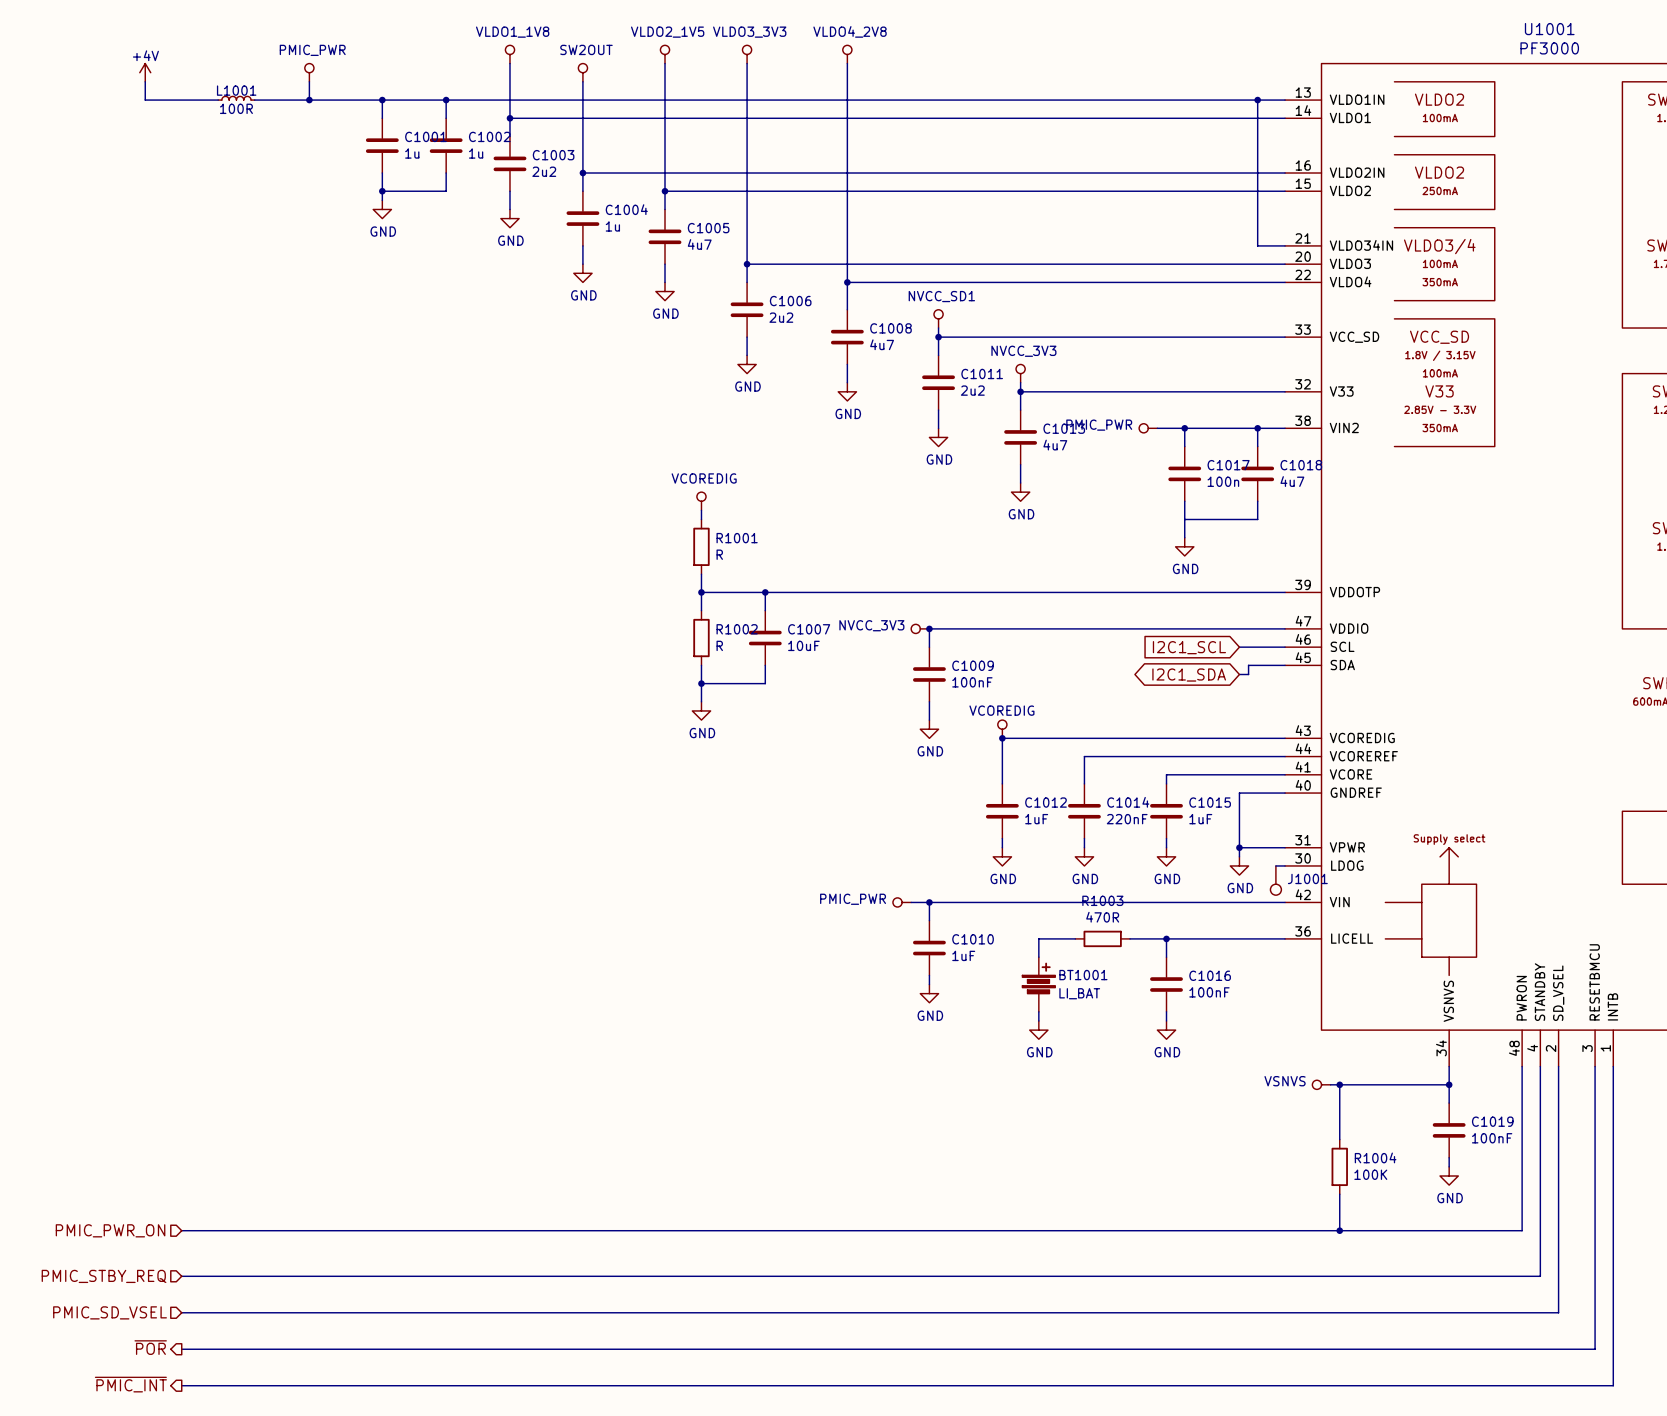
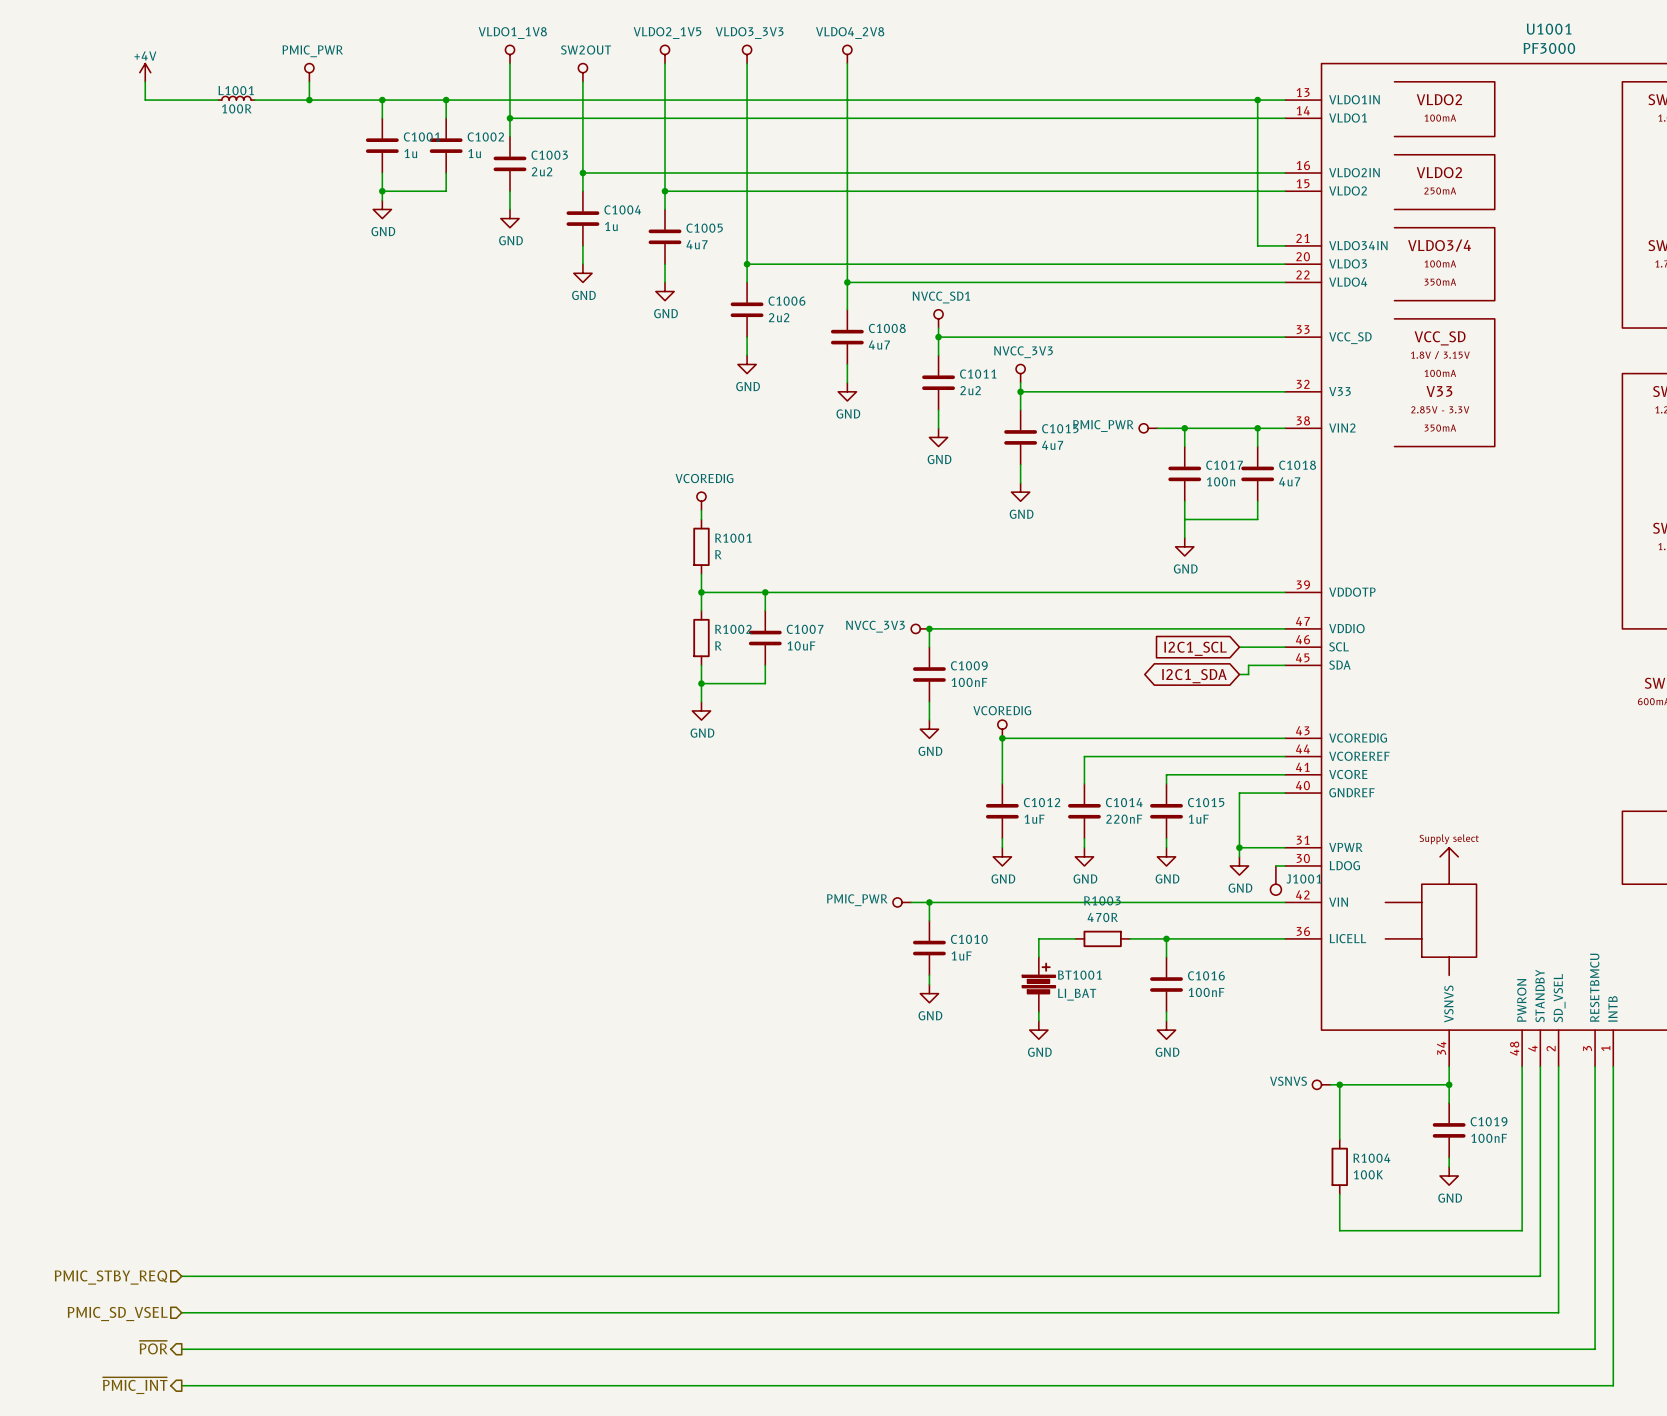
hierarchical label: PMIC_PWR_ON (110, 1230) -> none
wire: (181, 1230) (1339, 1230) -> none
junction: (1339, 1230) -> none

